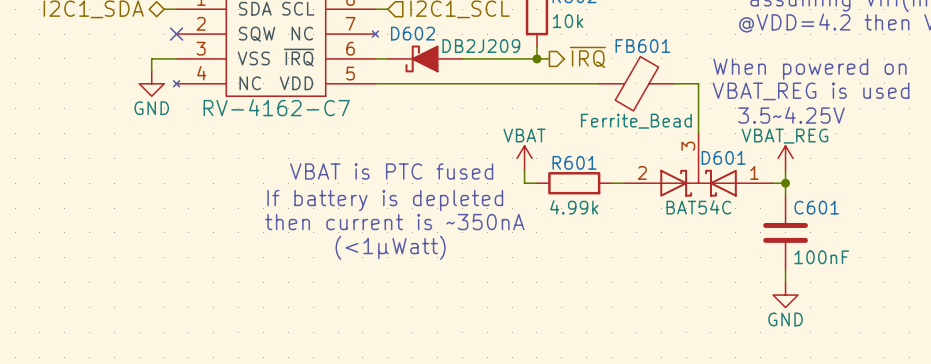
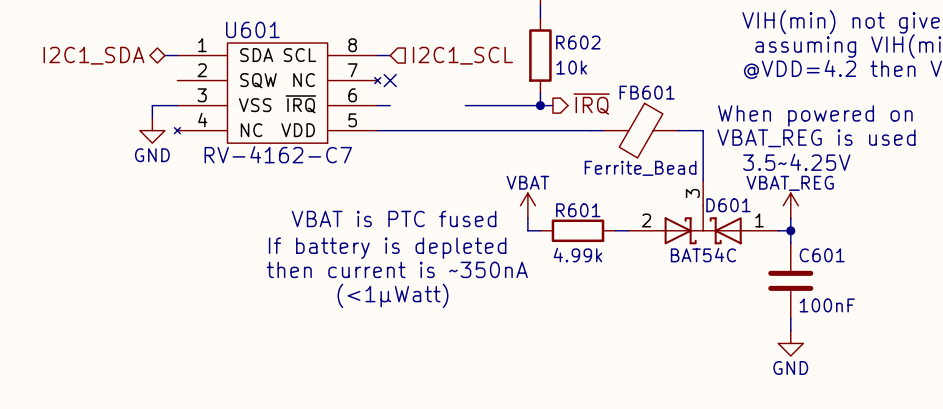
no-connect mark: (176, 34) -> none
no-connect mark: none -> (390, 80)
D602: DB2J209 (425, 58) -> none

